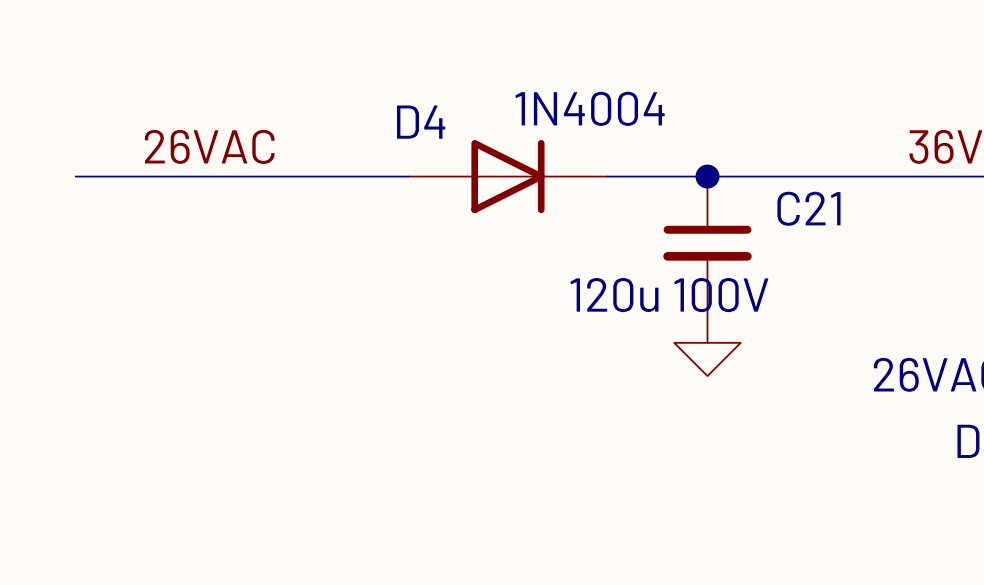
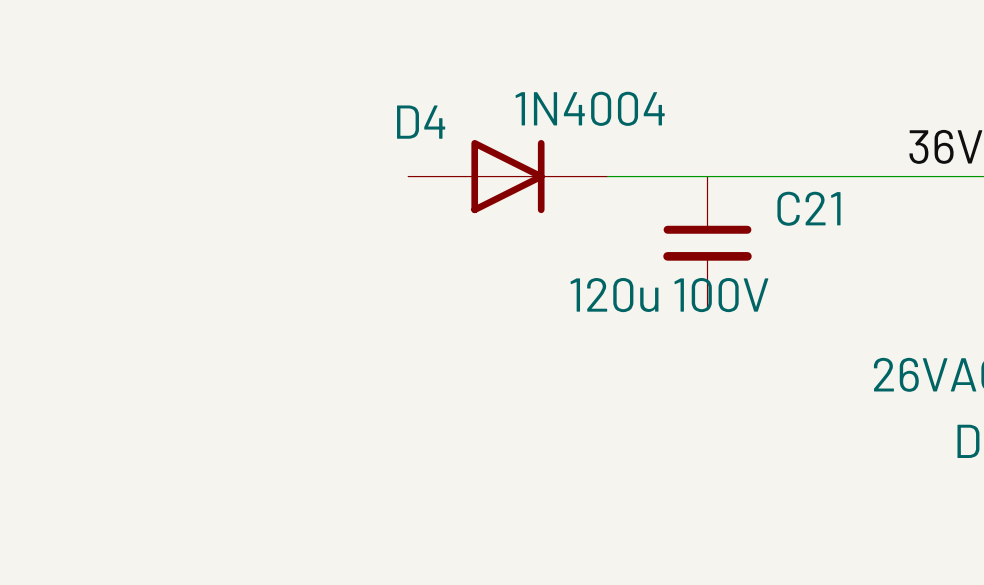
label: 26VAC (209, 146) -> none
wire: (75, 176) (408, 176) -> none
junction: (707, 176) -> none
power symbol: (707, 342) -> none

